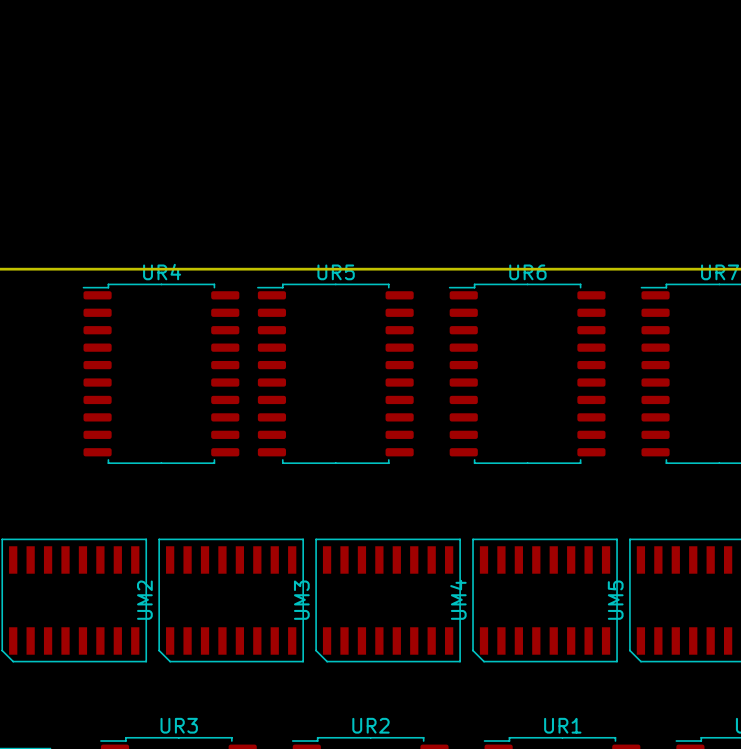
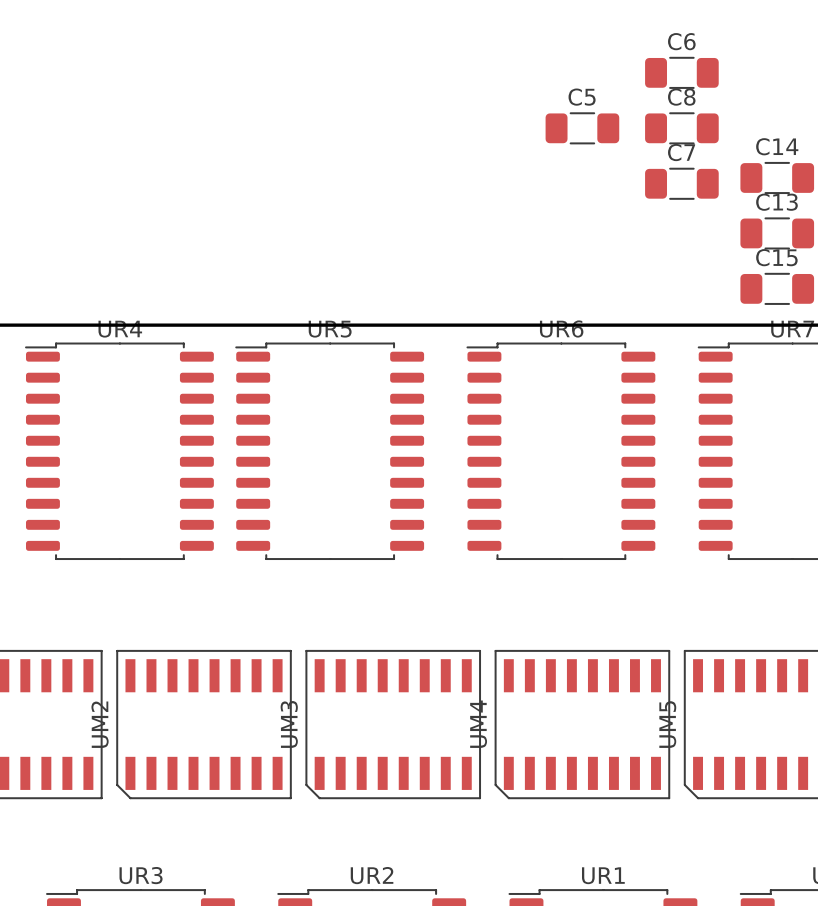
C6: none -> (681, 72)
C5: none -> (582, 128)
C8: none -> (681, 128)
C14: none -> (777, 177)
C7: none -> (681, 183)
C13: none -> (777, 233)
C15: none -> (777, 288)

